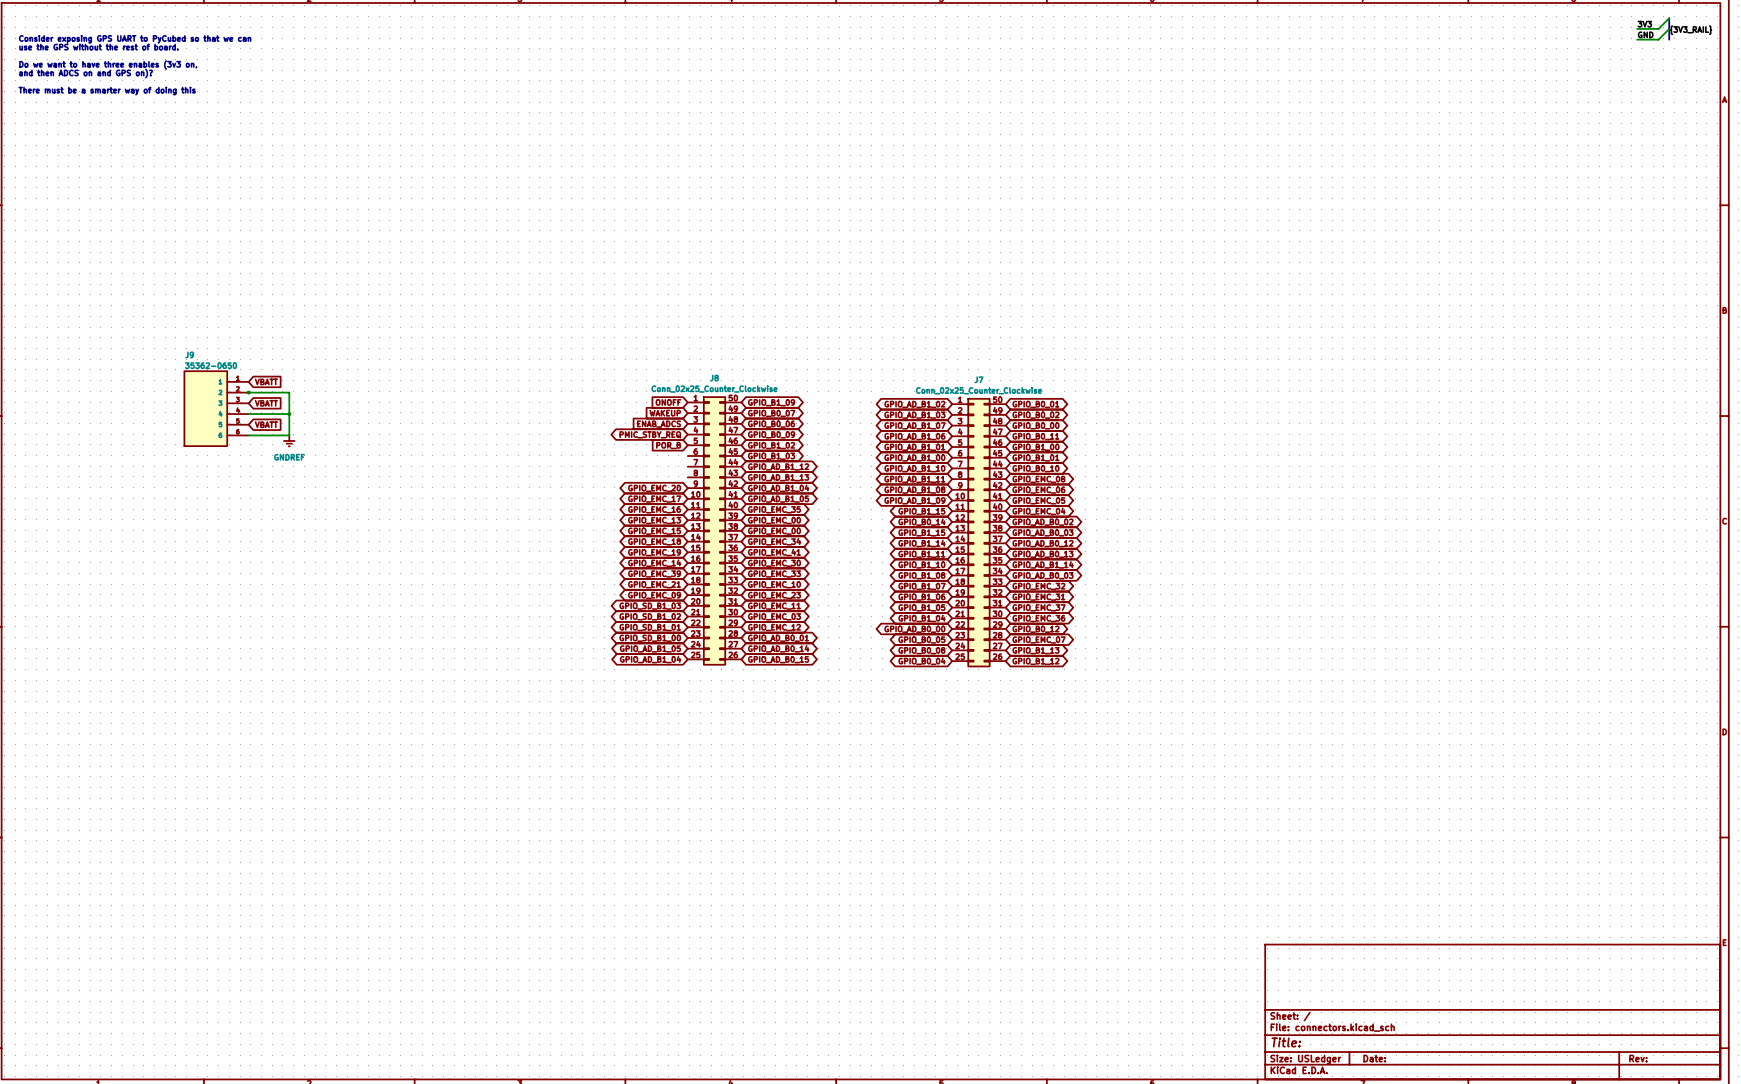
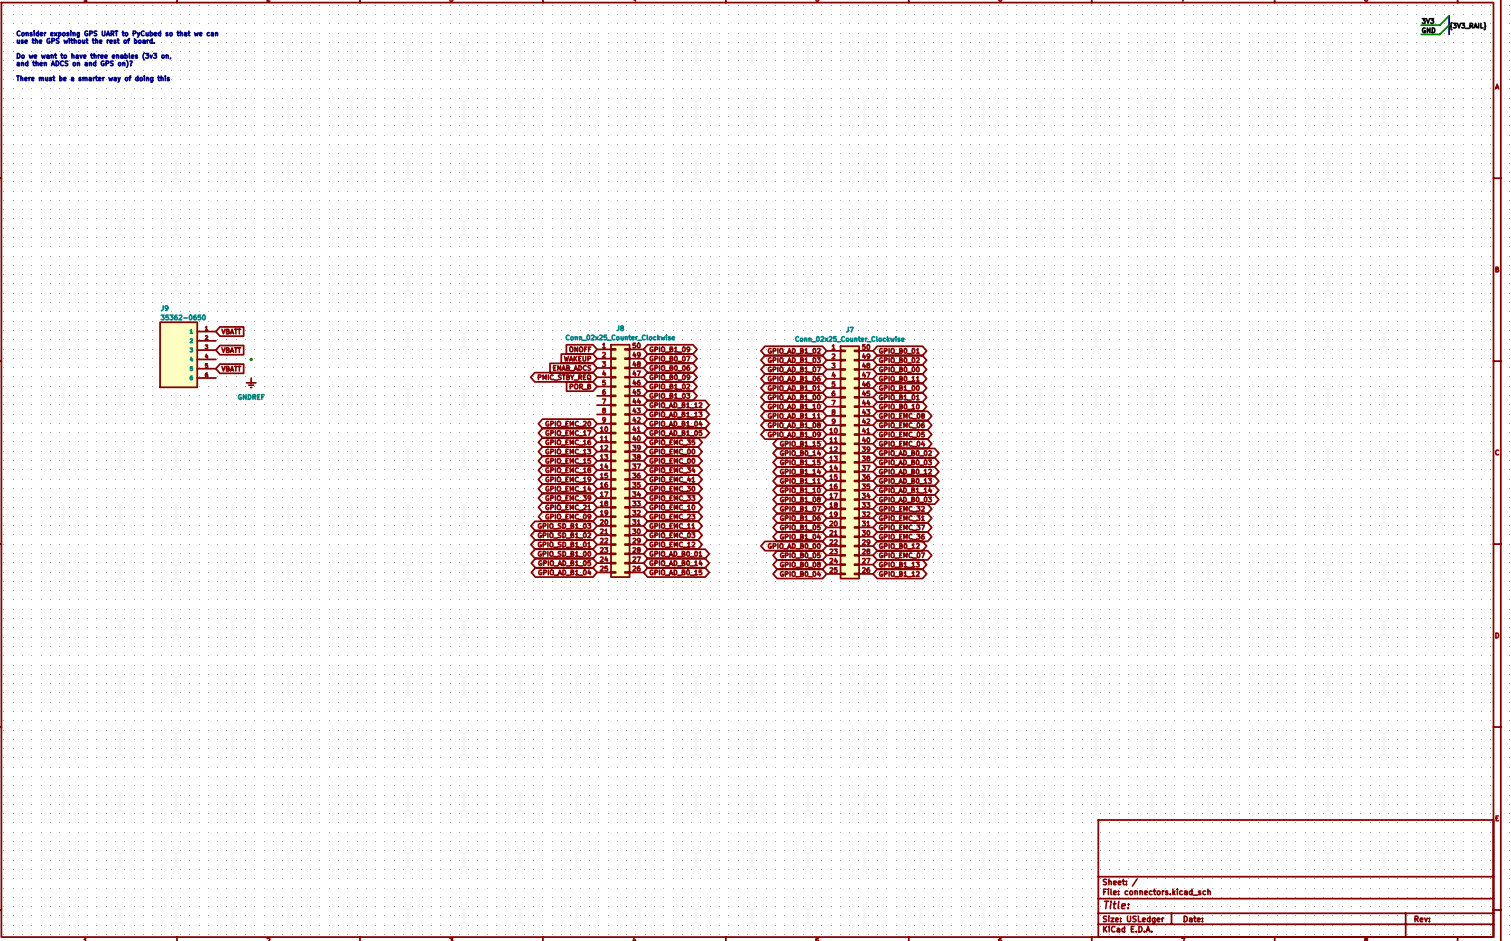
wire: (248, 392) (289, 392) (289, 435) (248, 435) -> none
junction: (248, 392) -> none
wire: (248, 414) (289, 414) -> none

